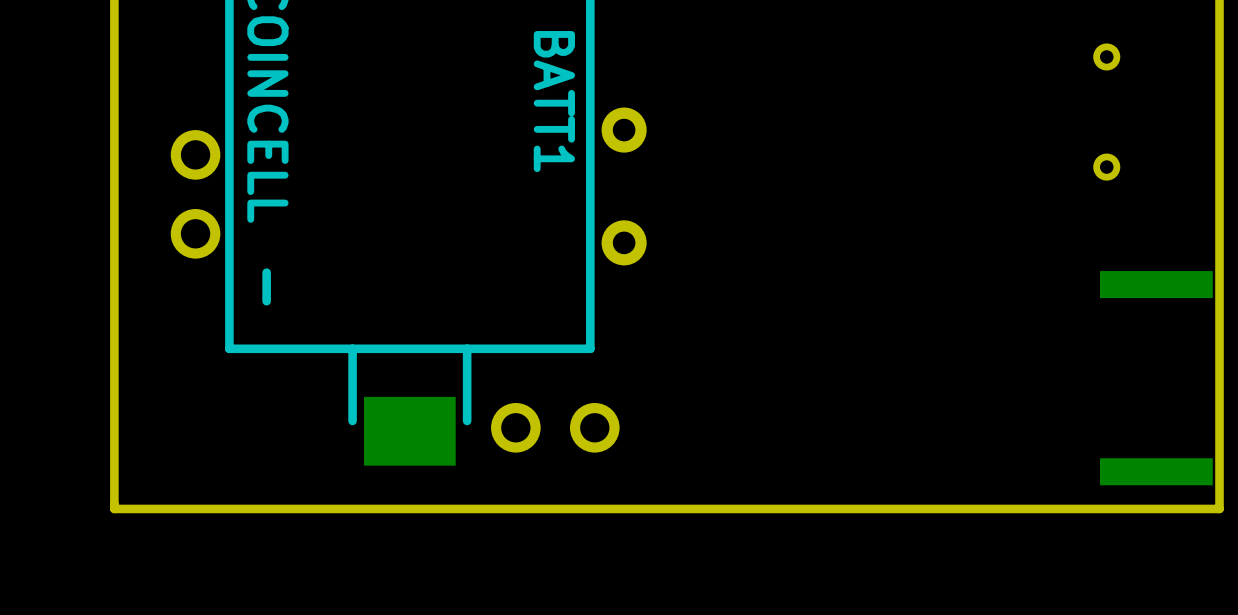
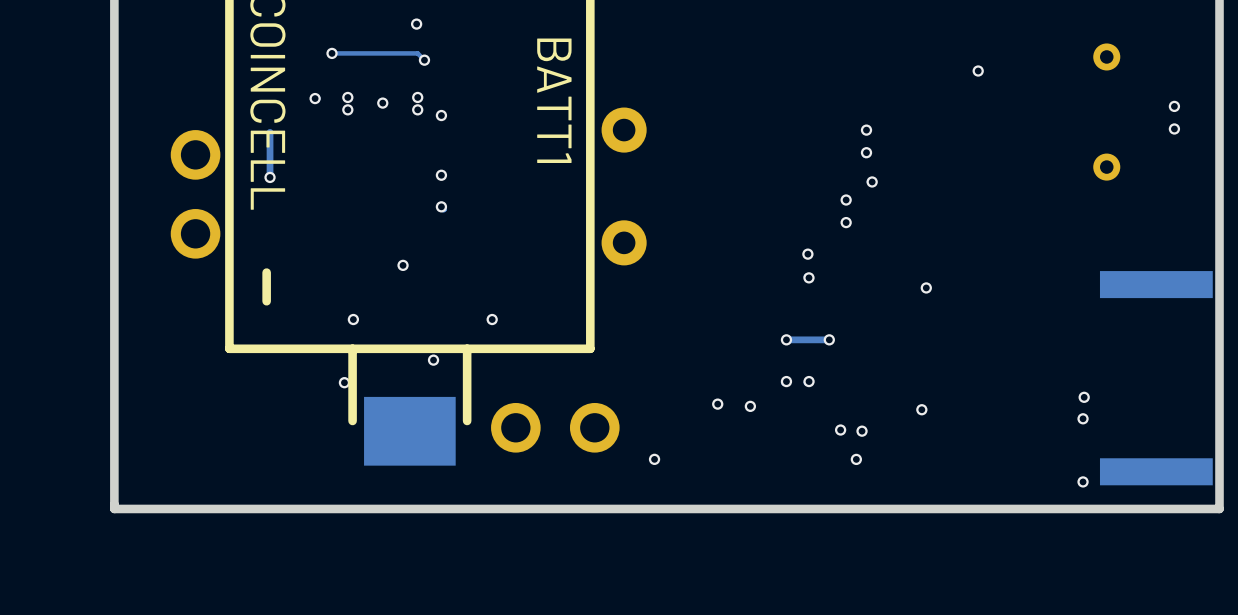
via: none -> (416, 24)
track: none -> (332, 53) (417, 53) (424, 60)
via: none -> (332, 53)
via: none -> (424, 60)
via: none -> (978, 71)
via: none -> (347, 97)
via: none -> (417, 97)
via: none -> (315, 98)
via: none -> (382, 103)
via: none -> (1174, 106)
via: none -> (347, 109)
via: none -> (417, 109)
via: none -> (441, 115)
via: none -> (1174, 128)
via: none -> (866, 130)
track: none -> (270, 132) (270, 177)
via: none -> (866, 152)
via: none -> (441, 175)
via: none -> (270, 177)
via: none -> (872, 181)
via: none -> (846, 200)
via: none -> (441, 206)
via: none -> (846, 222)
via: none -> (807, 254)
via: none -> (403, 265)
via: none -> (808, 277)
via: none -> (926, 287)
via: none -> (353, 319)
via: none -> (492, 319)
via: none -> (786, 339)
track: none -> (829, 339) (786, 339)
via: none -> (829, 339)
via: none -> (433, 360)
via: none -> (786, 381)
via: none -> (809, 381)
via: none -> (344, 382)
via: none -> (1084, 397)
via: none -> (717, 404)
via: none -> (750, 406)
via: none -> (921, 409)
via: none -> (1083, 418)
via: none -> (840, 430)
via: none -> (862, 431)
via: none -> (654, 459)
via: none -> (856, 459)
via: none -> (1083, 481)

